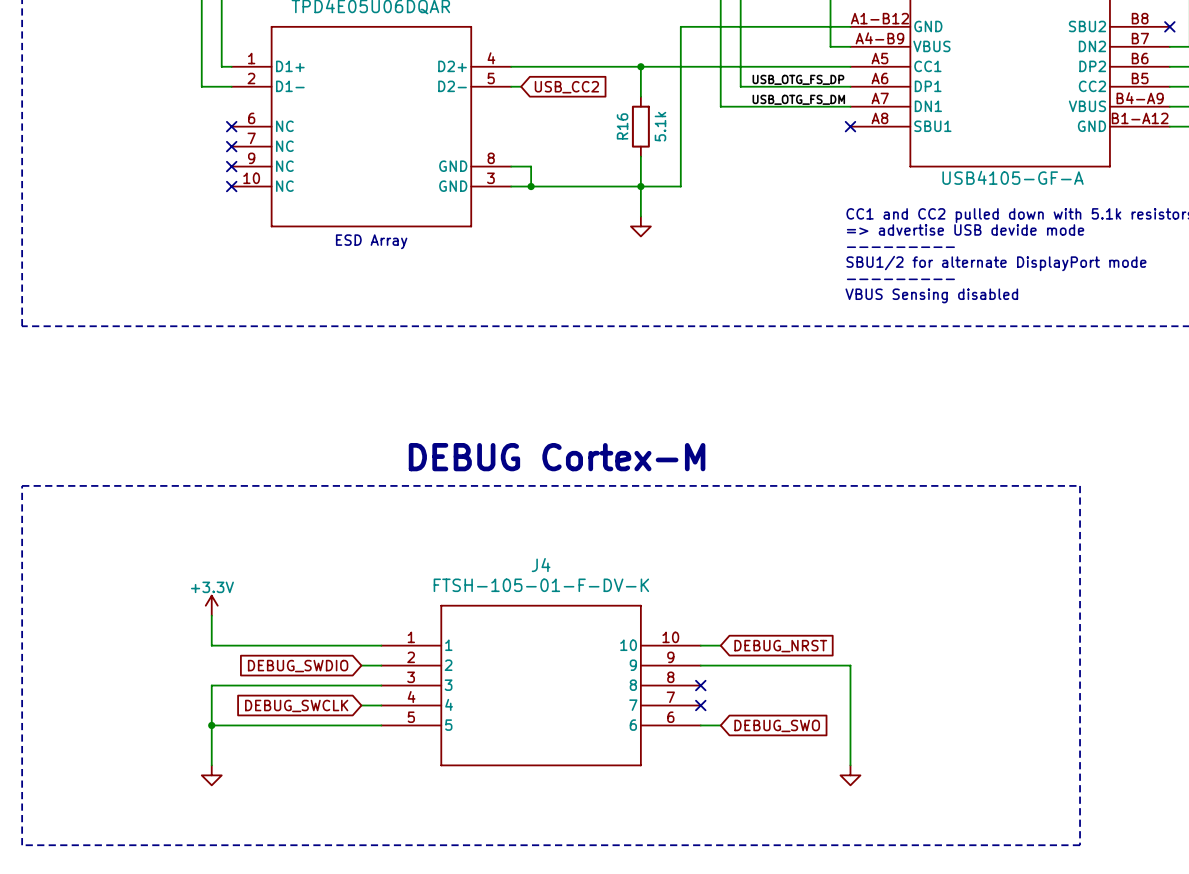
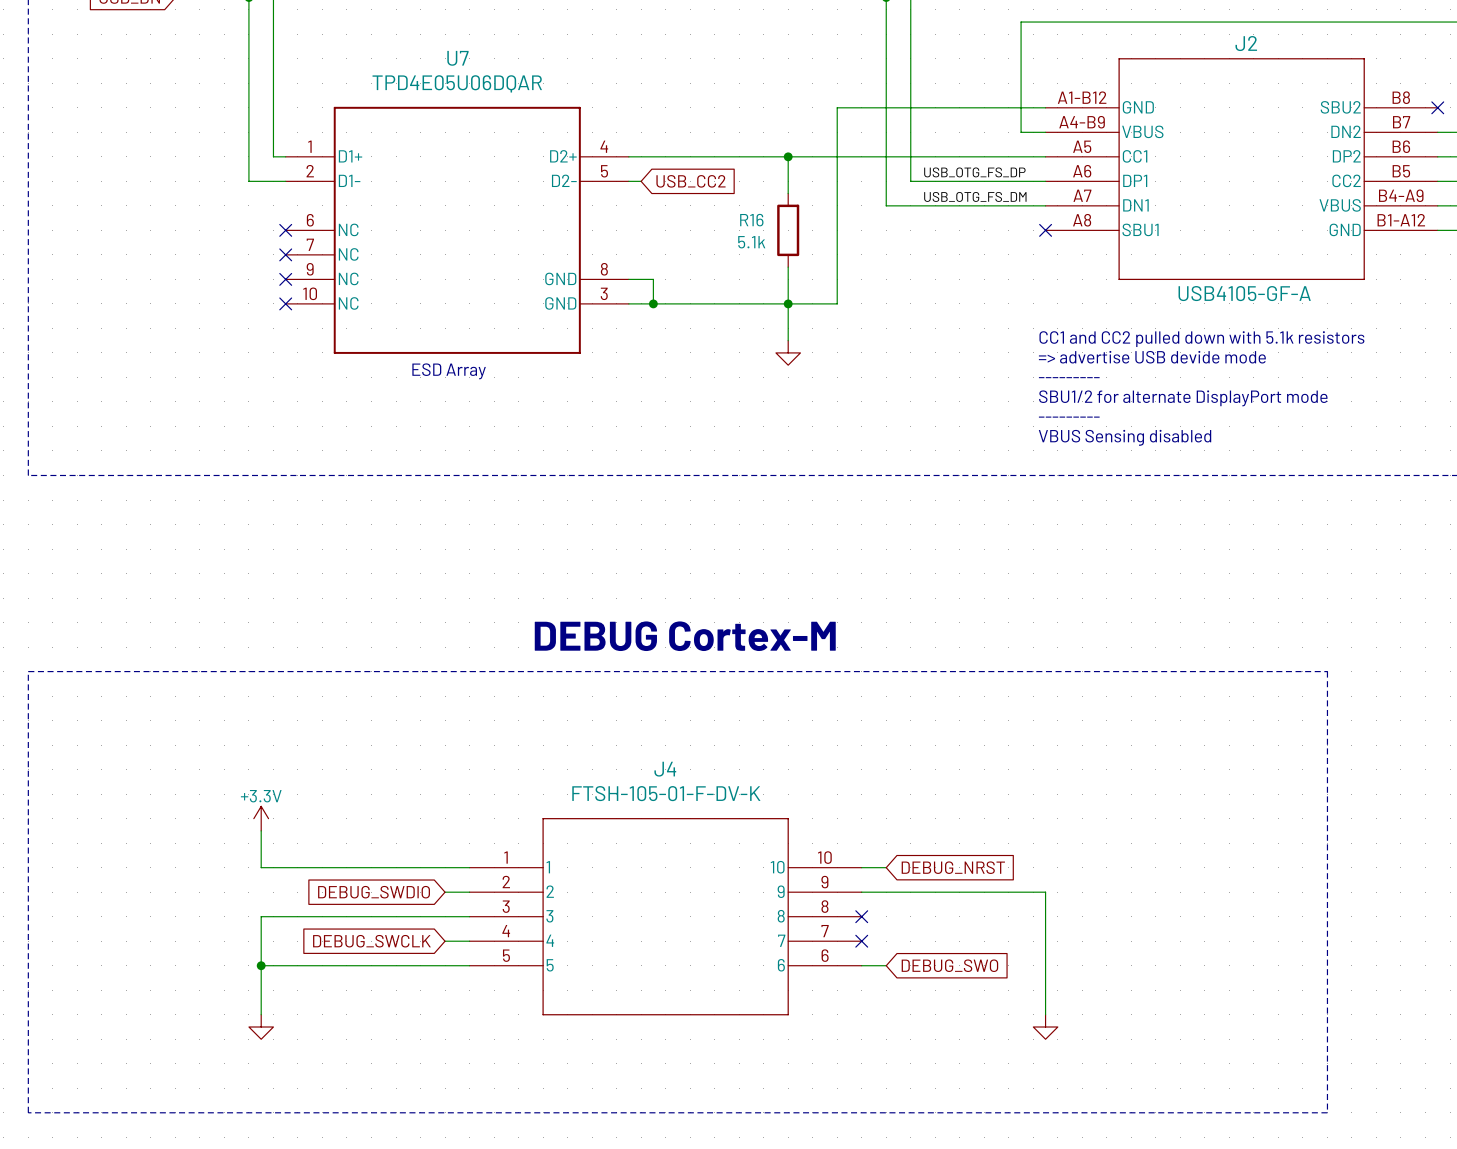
R16 name rotation: 0° (622, 126) -> 90° clockwise (751, 220)
R16 value rotation: 0° (660, 126) -> 90° clockwise (751, 242)
R16 value position: 5.1k (660, 126) -> 5.1k (751, 242)

